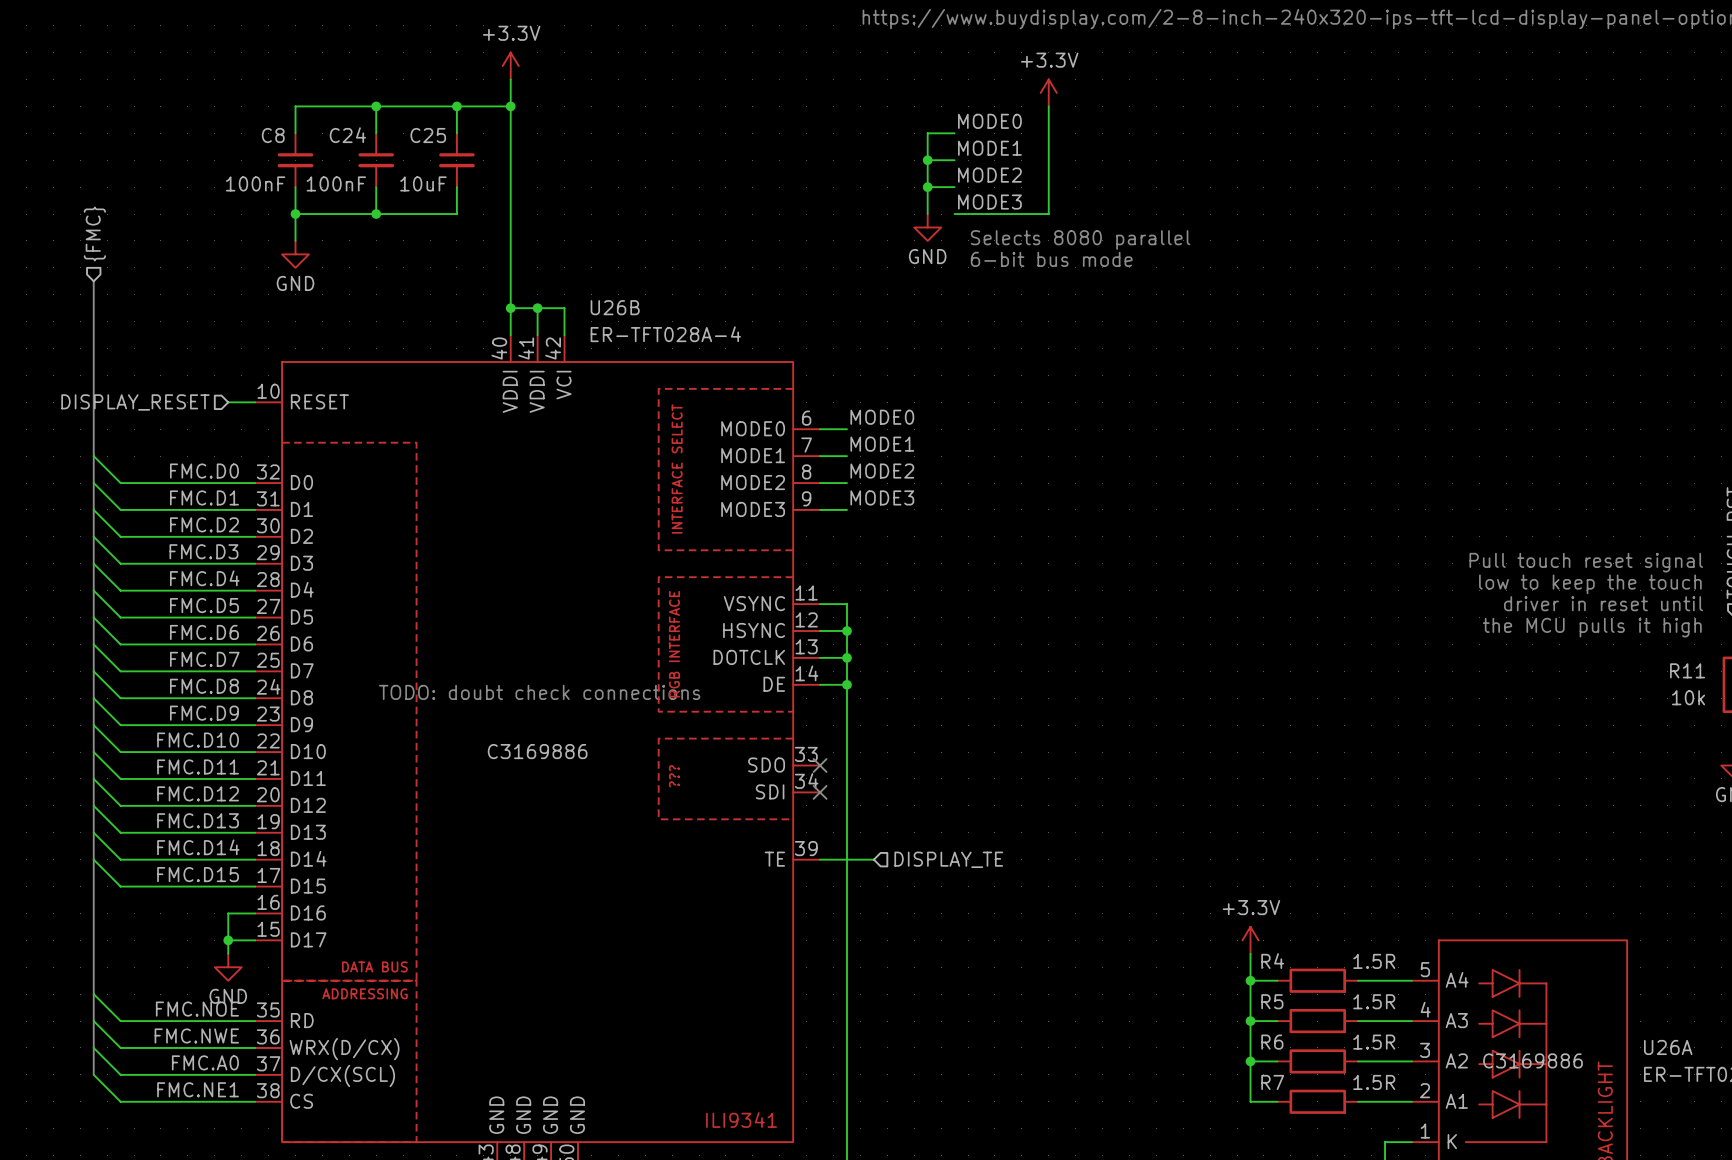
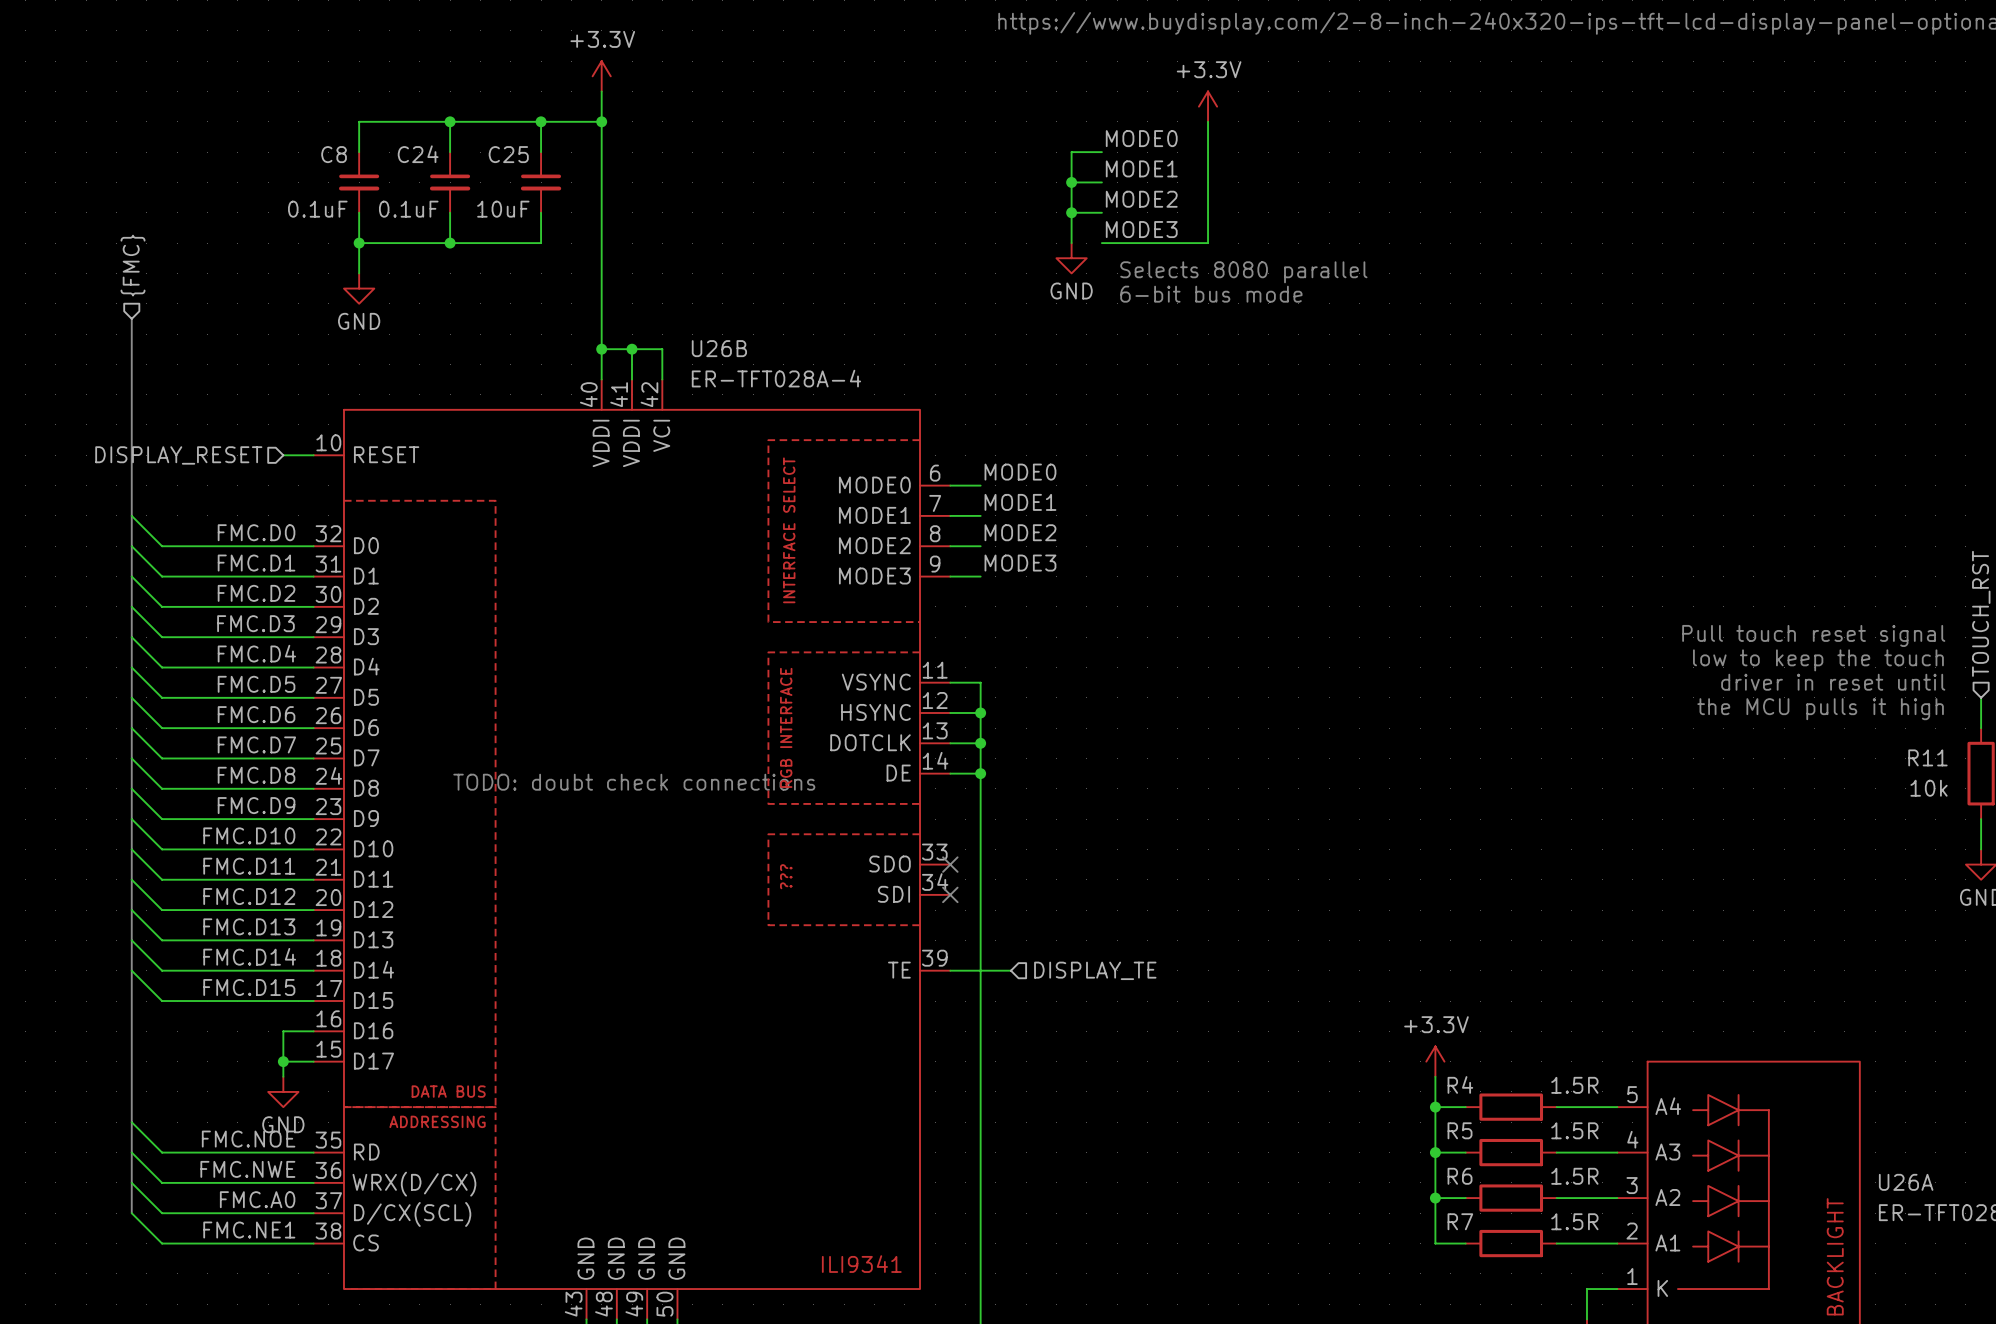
C8 value: 100nF (255, 183) -> 0.1uF (317, 209)
C24 value: 100nF (336, 183) -> 0.1uF (408, 209)
U26B text: C3169886 (537, 751) -> none
U26A text: C3169886 (1532, 1060) -> none

